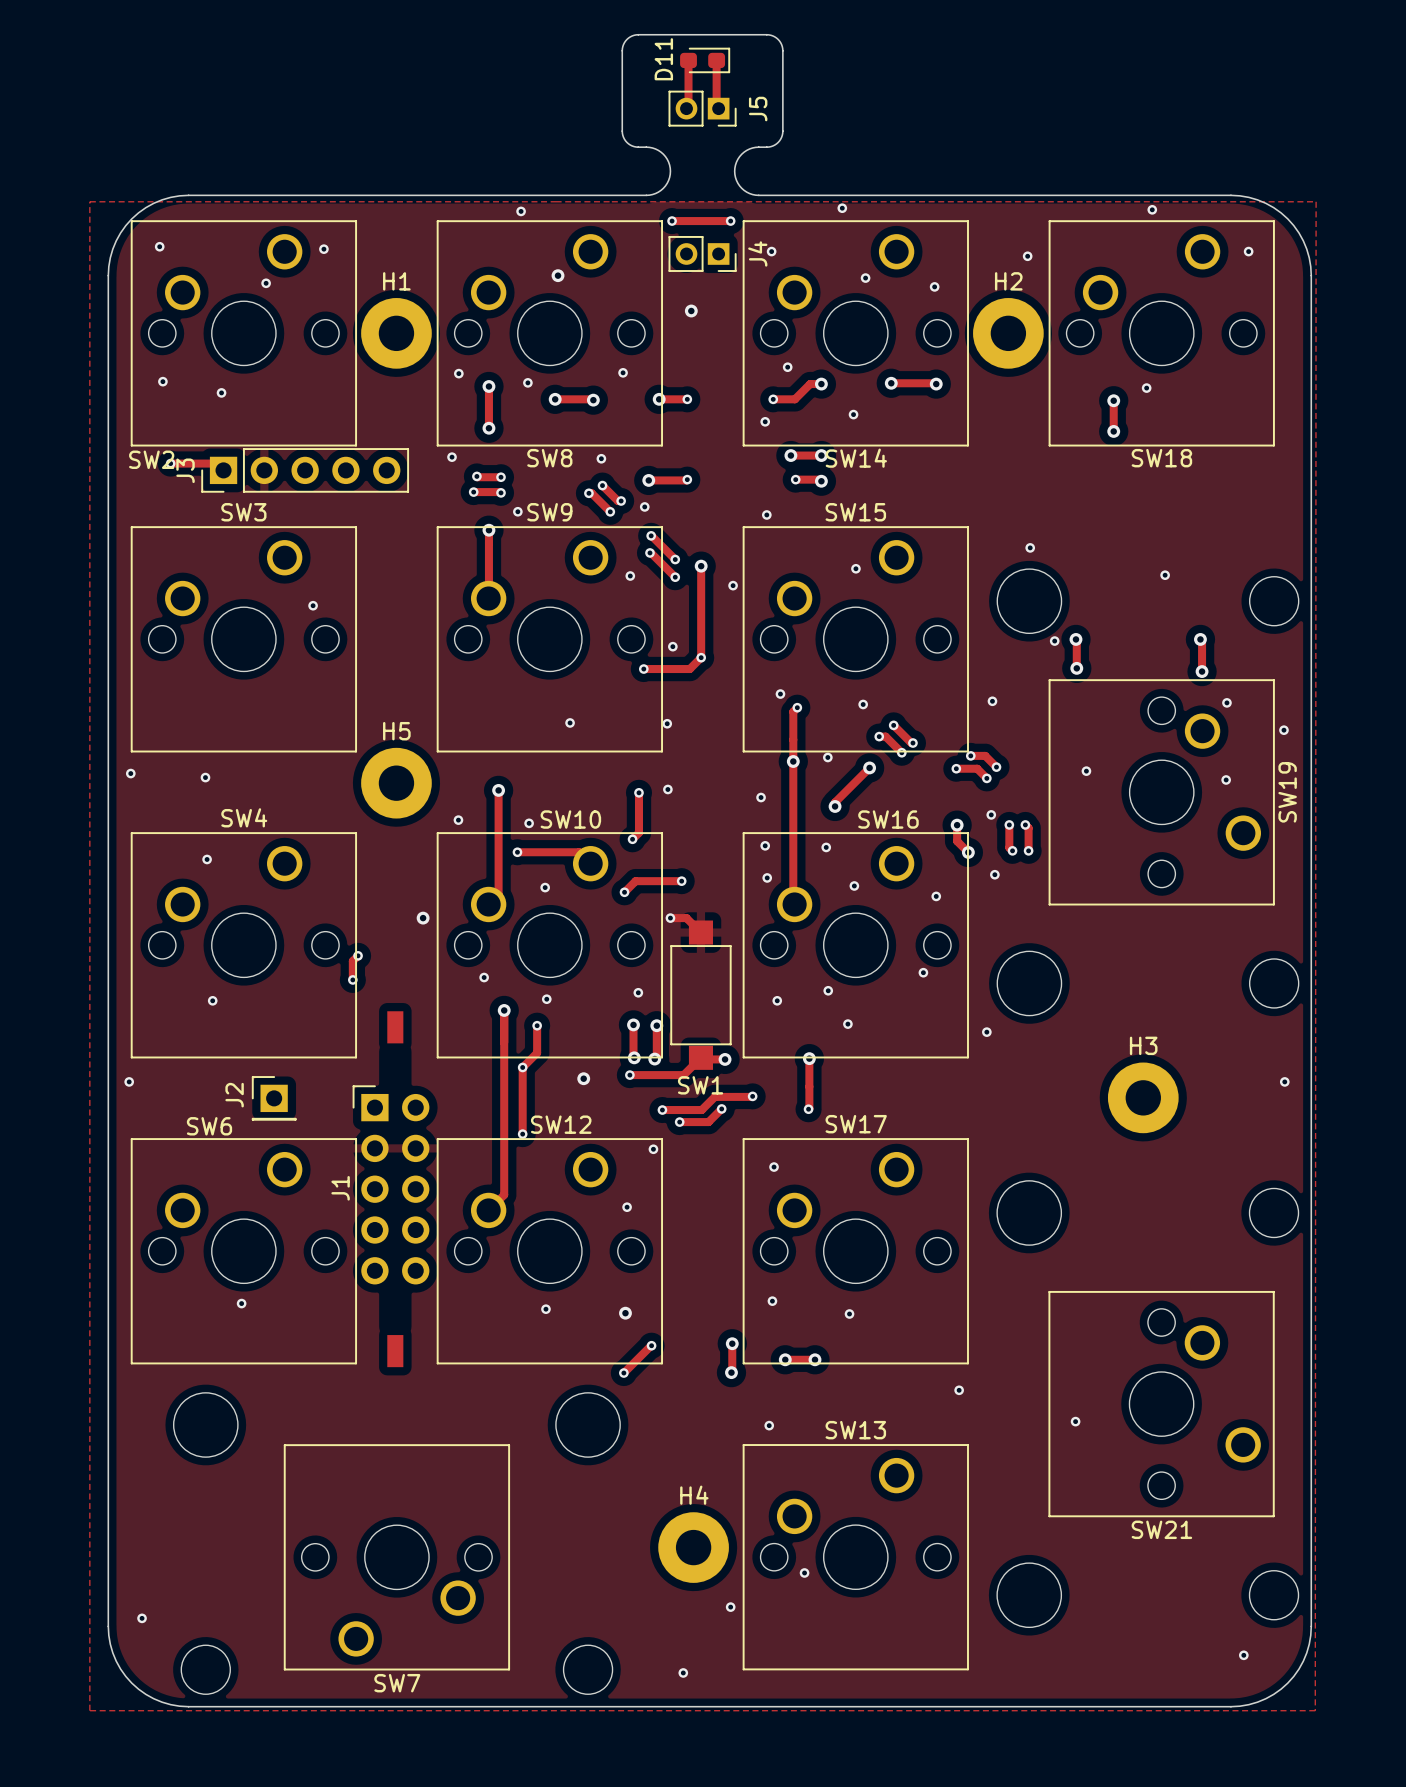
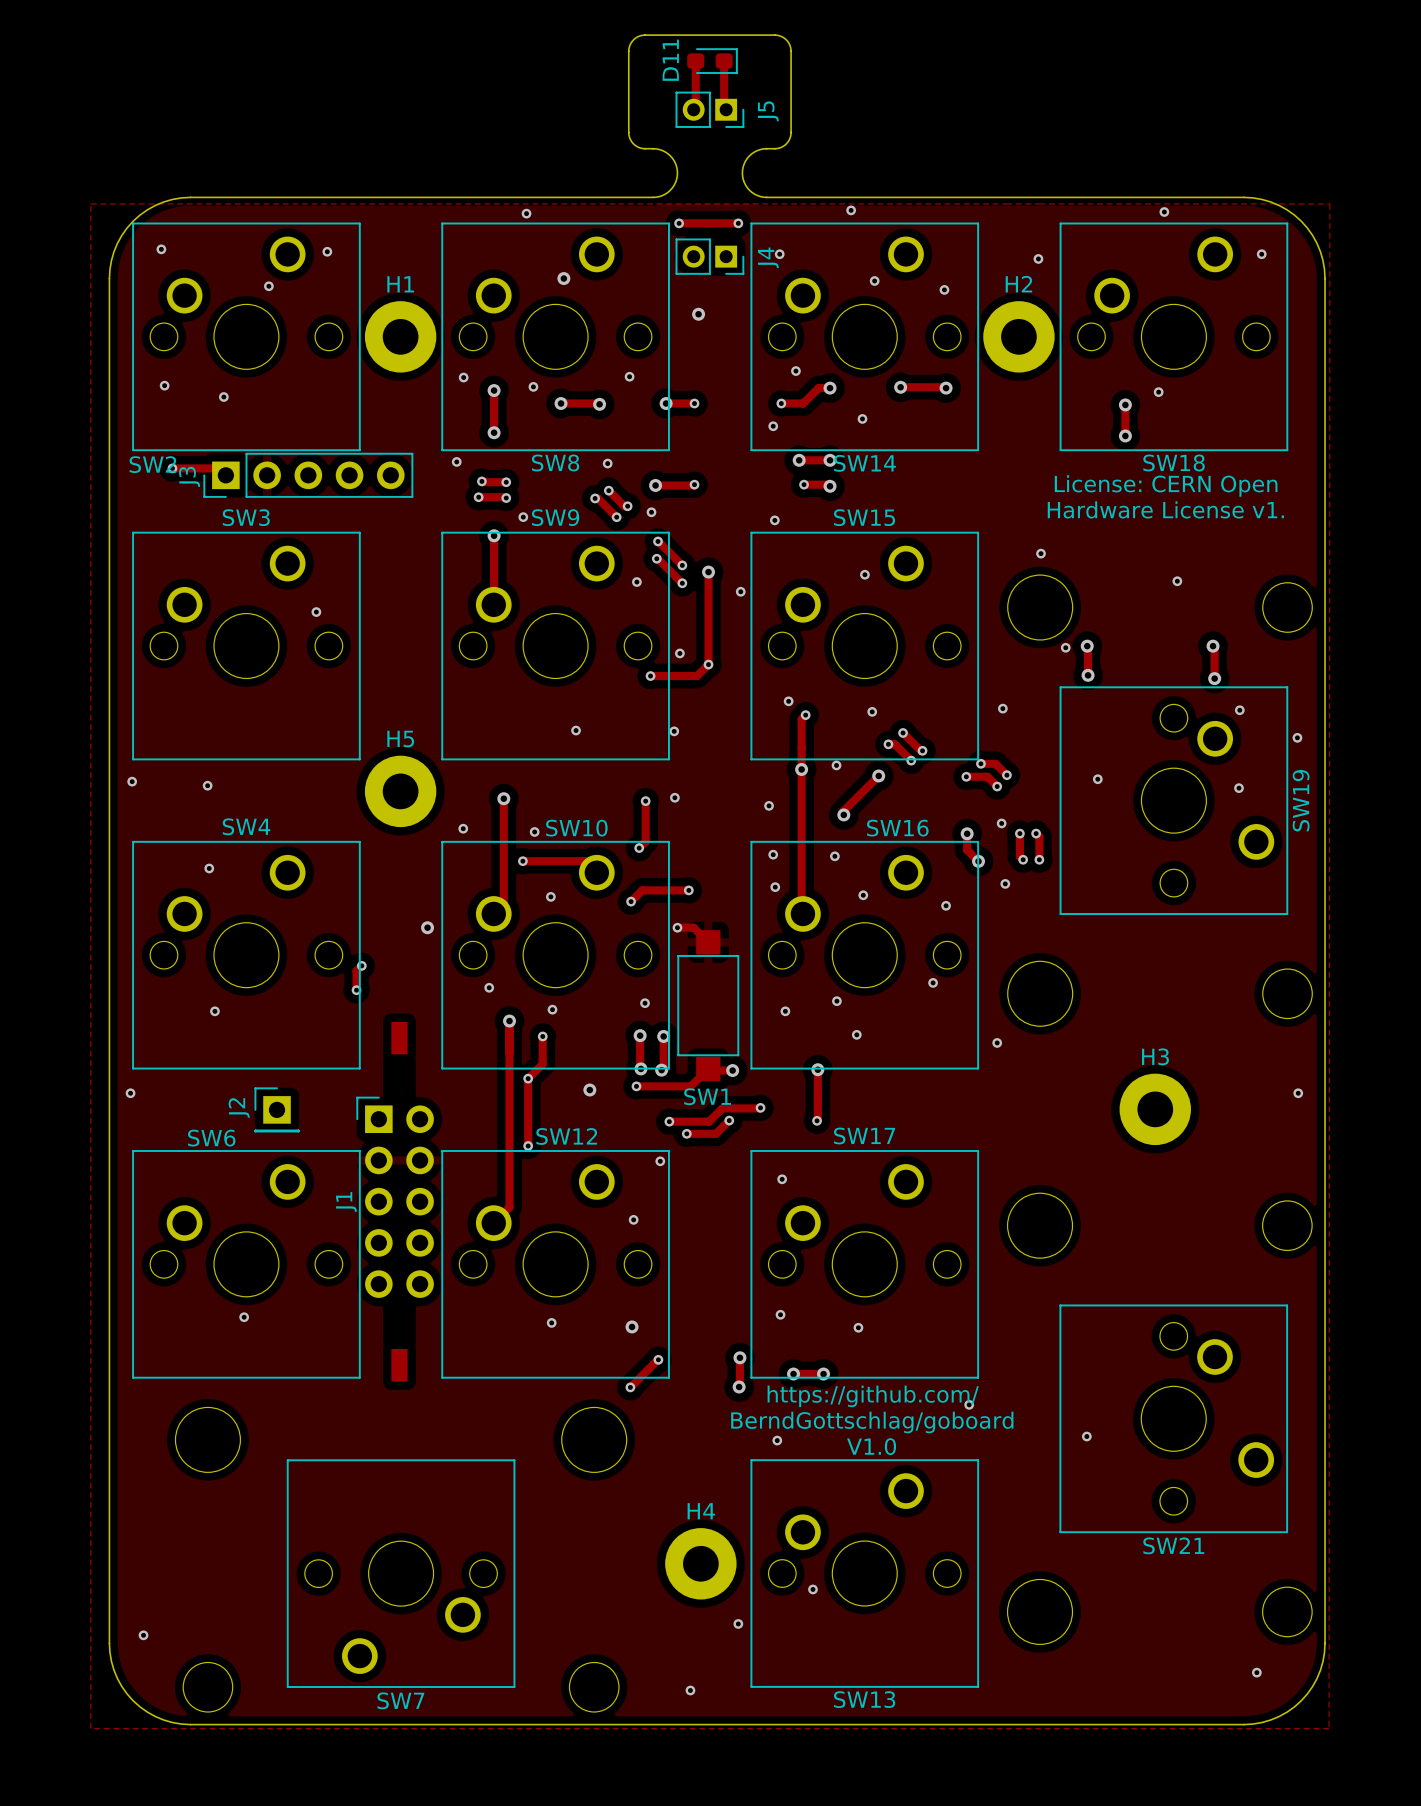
text: none -> License: CERN Open (1166, 485)
text: none -> Hardware License v1. (1165, 509)
text: none -> https://github.com/ (873, 1396)
text: none -> BerndGottschlag/goboard (872, 1422)
SW13 name position: SW13 (855, 1430) -> SW13 (864, 1699)
text: none -> V1.0 (871, 1446)

